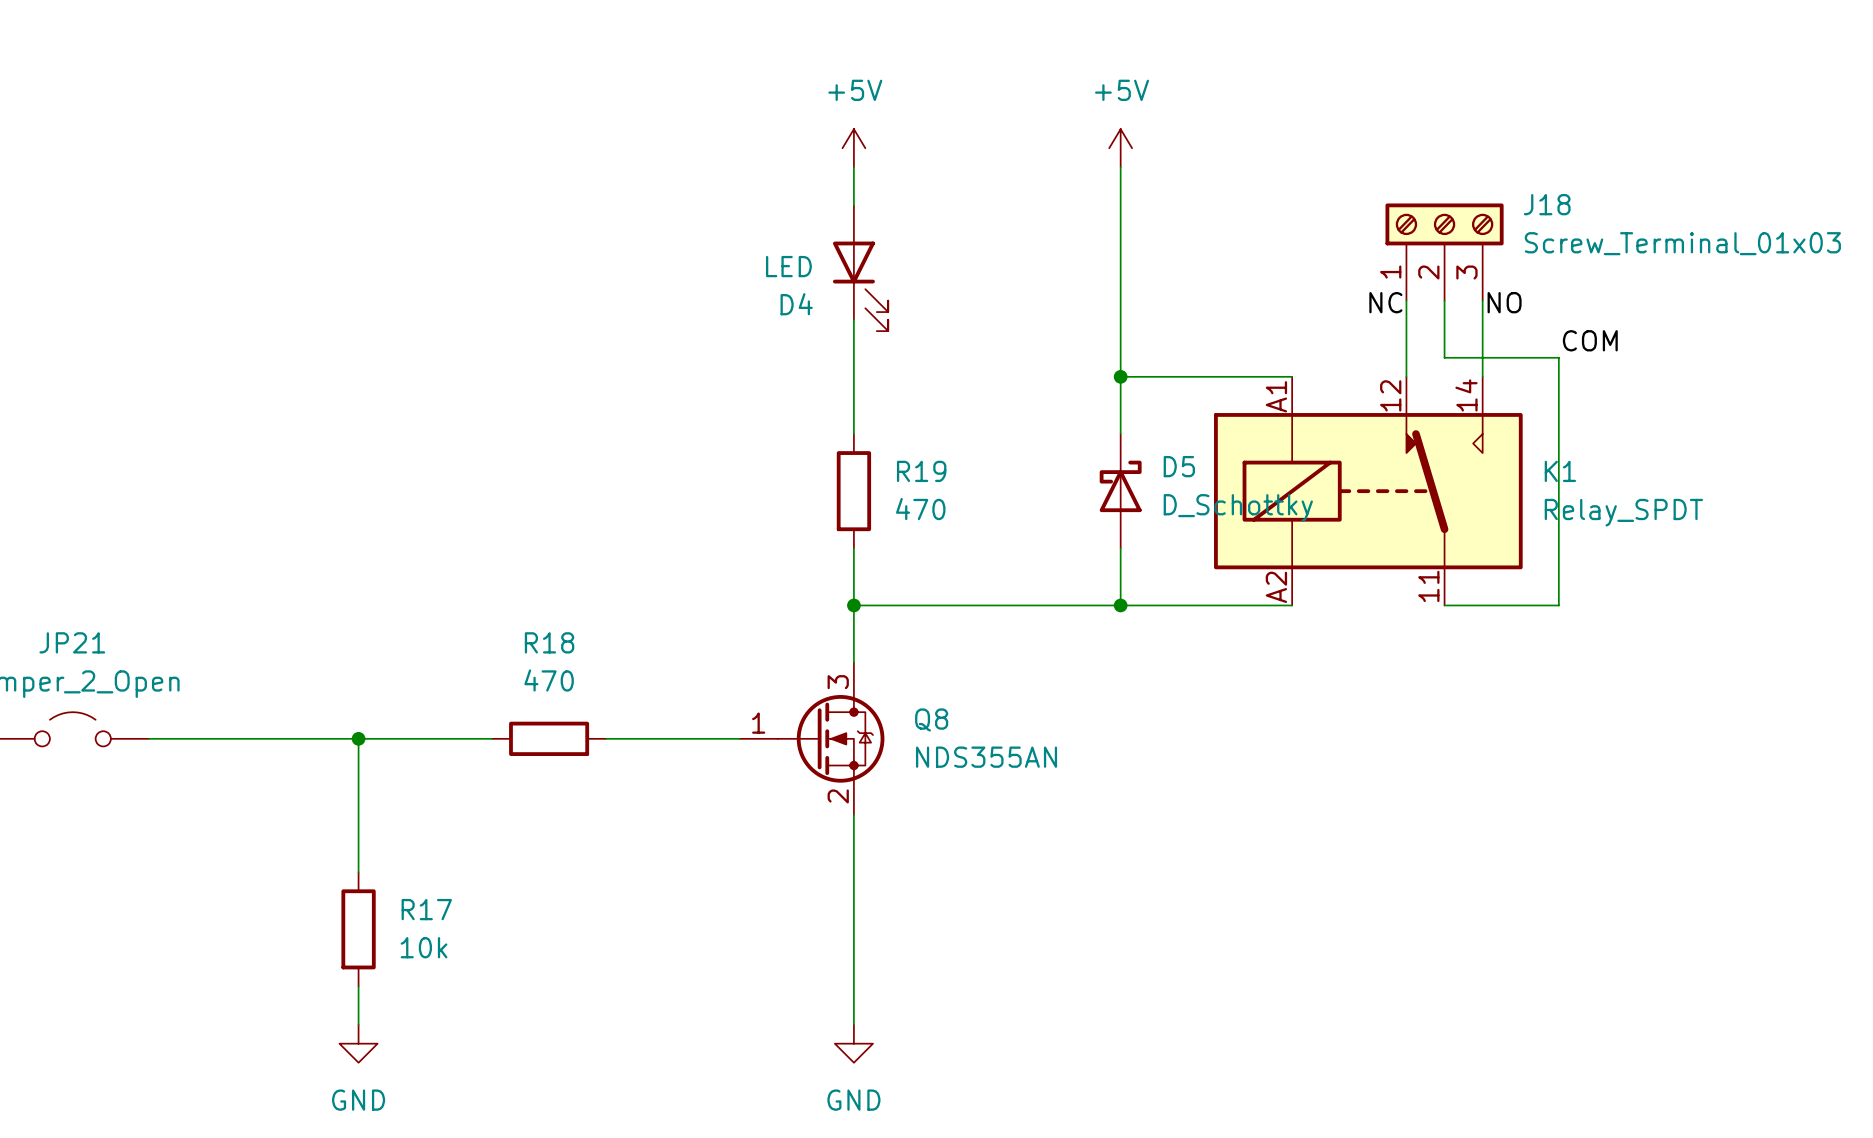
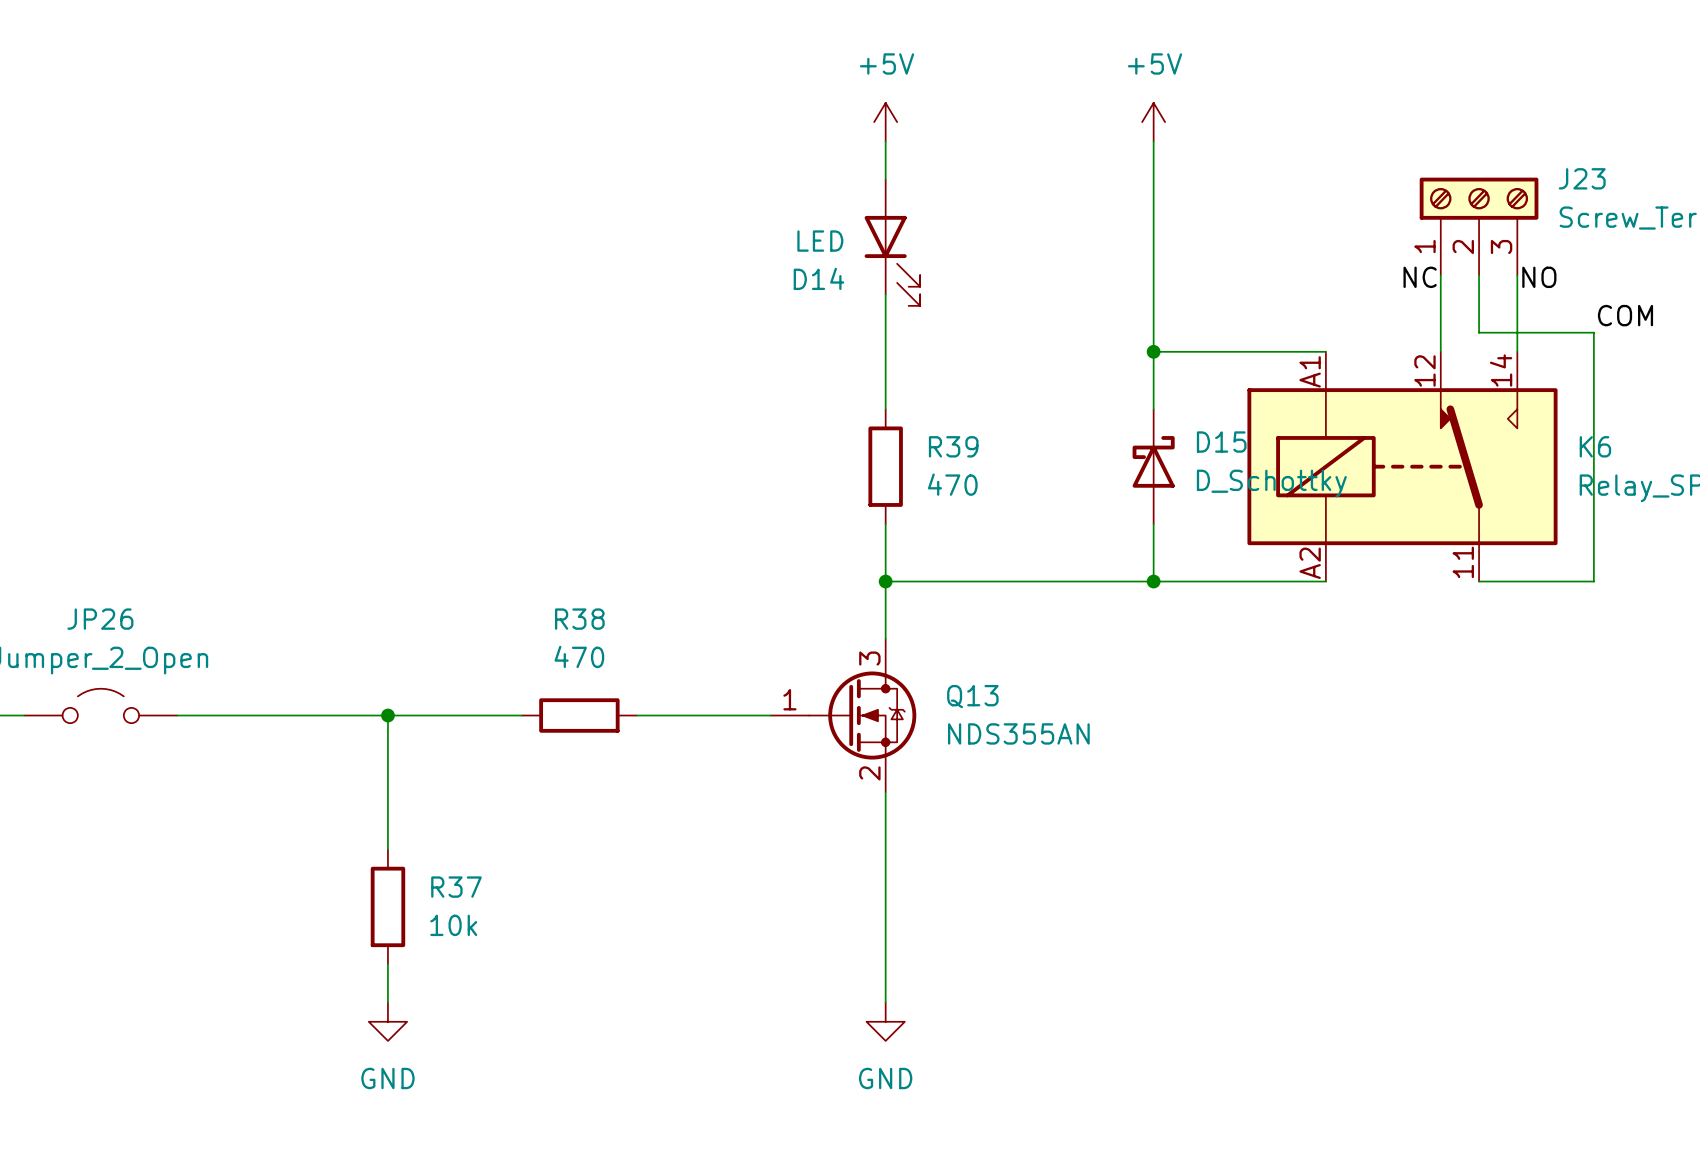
J18 name: J18 (1547, 204) -> J23 (1582, 178)
D4 name: D4 (796, 304) -> D14 (818, 278)
D5 name: D5 (1179, 466) -> D15 (1221, 442)
R19 name: R19 (921, 471) -> R39 (953, 446)
K1 name: K1 (1560, 471) -> K6 (1595, 446)
JP21 name: JP21 (72, 642) -> JP26 (100, 619)
R18 name: R18 (549, 642) -> R38 (579, 619)
Q8 name: Q8 (931, 719) -> Q13 (972, 696)
R17 name: R17 (426, 909) -> R37 (456, 887)

